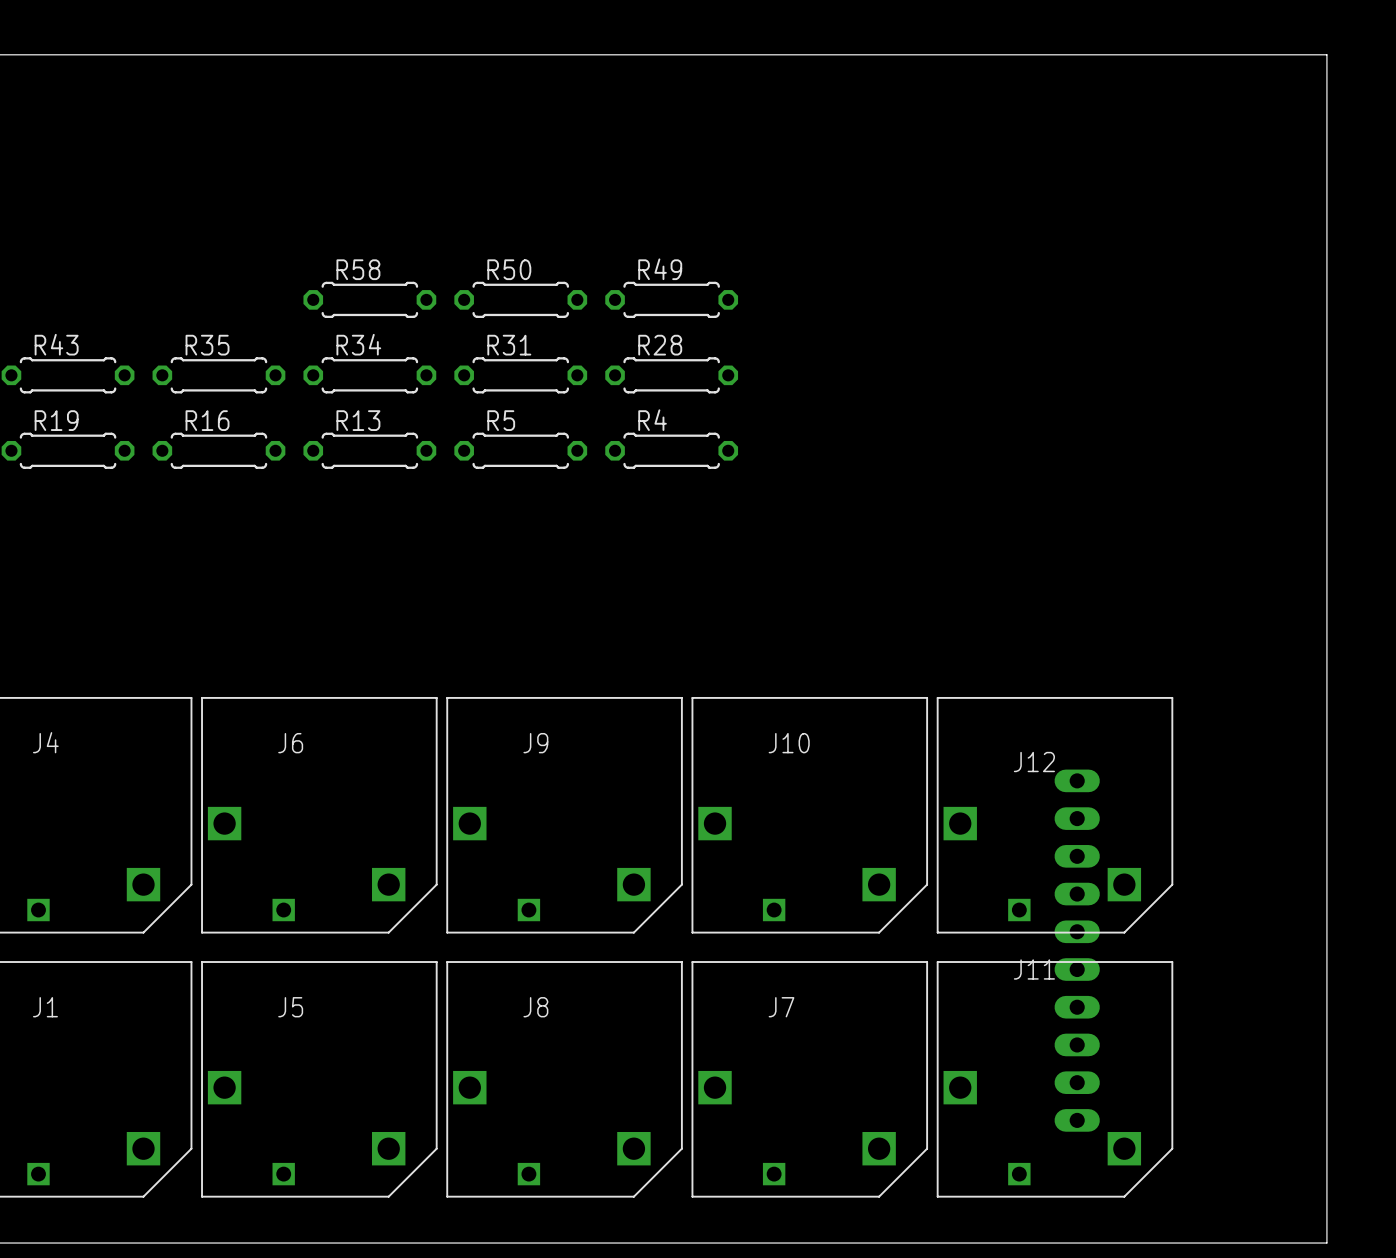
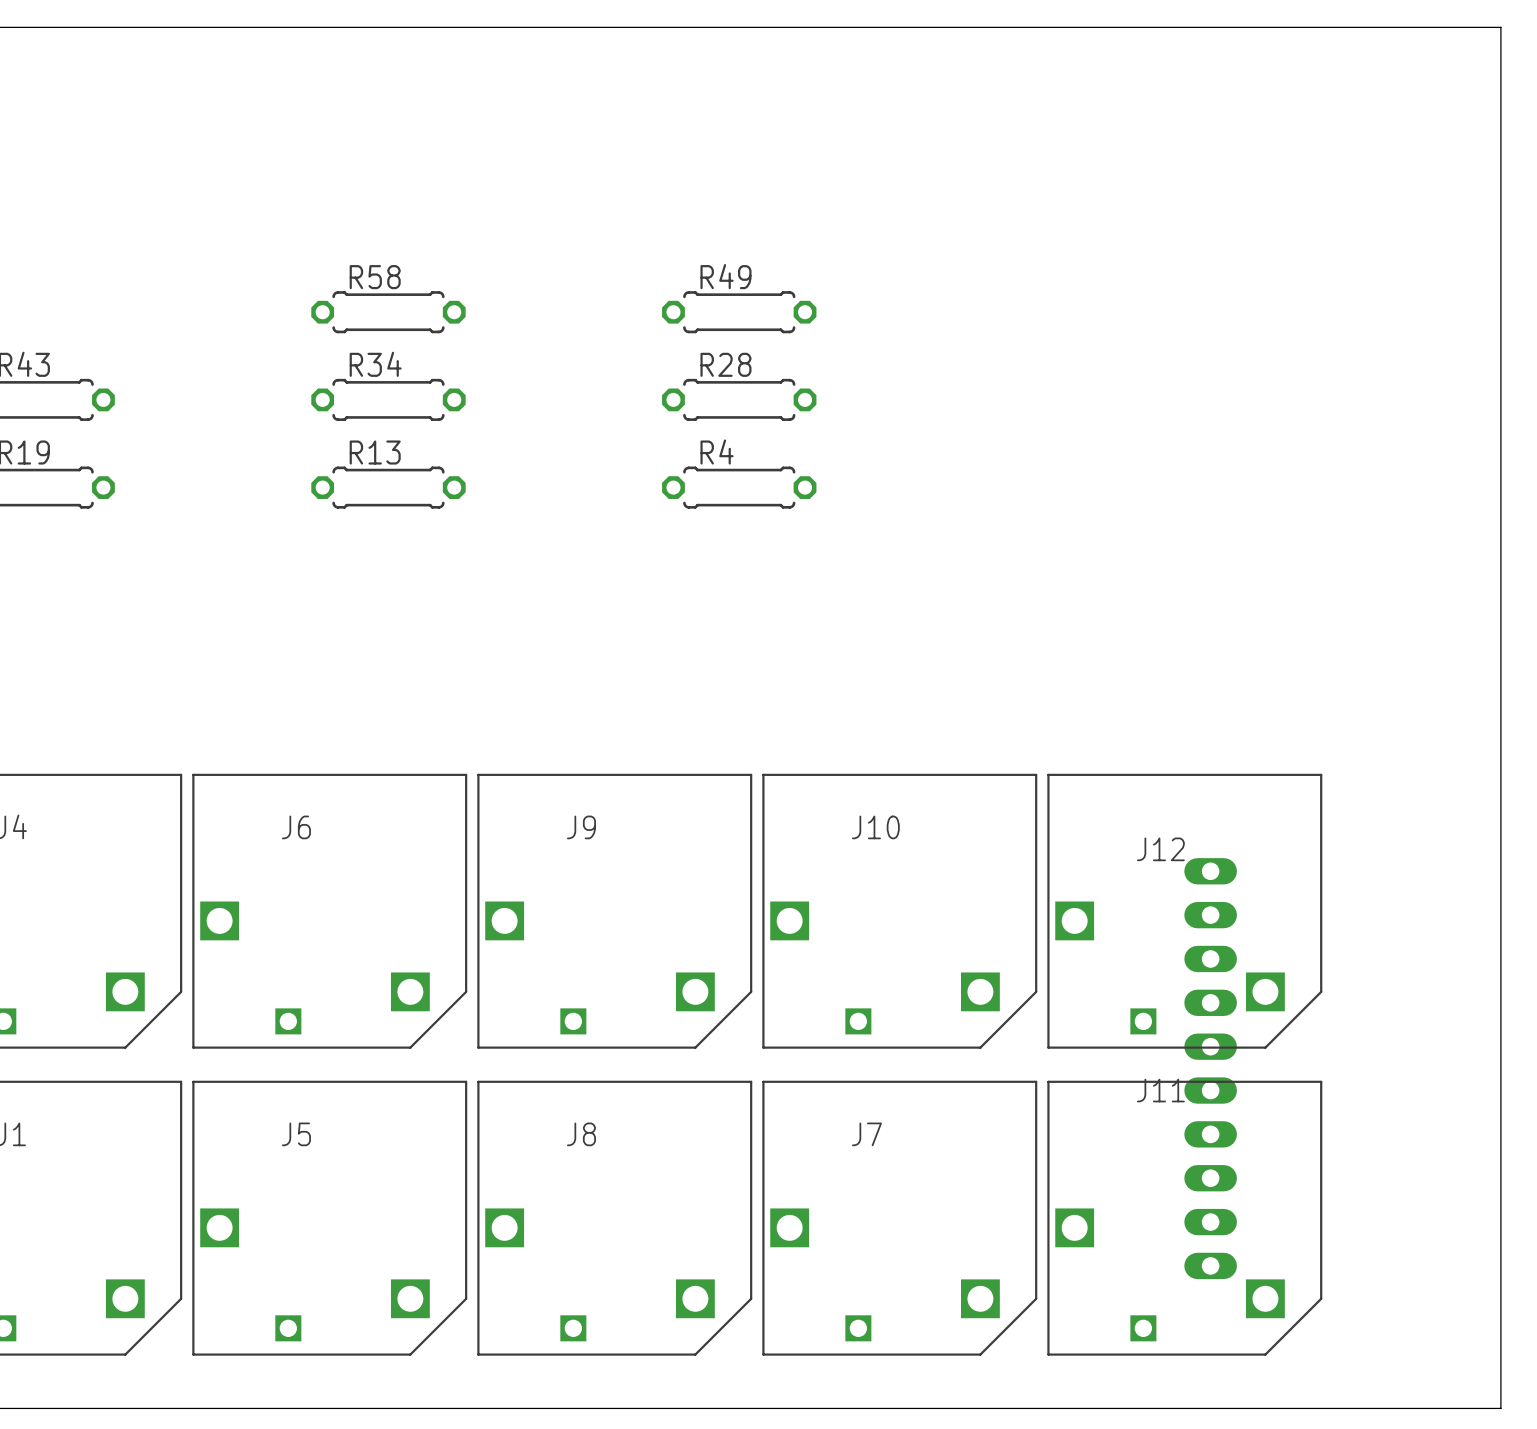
R50: (520, 299) -> none
R35: (218, 375) -> none
R31: (520, 375) -> none
R16: (218, 450) -> none
R5: (520, 450) -> none

